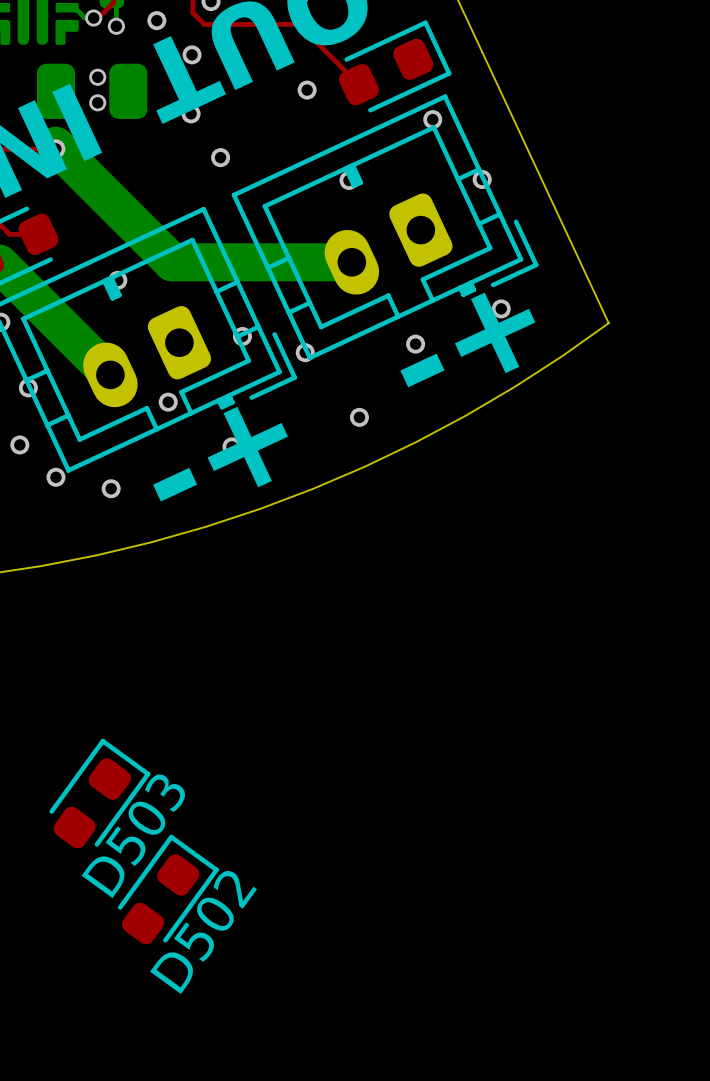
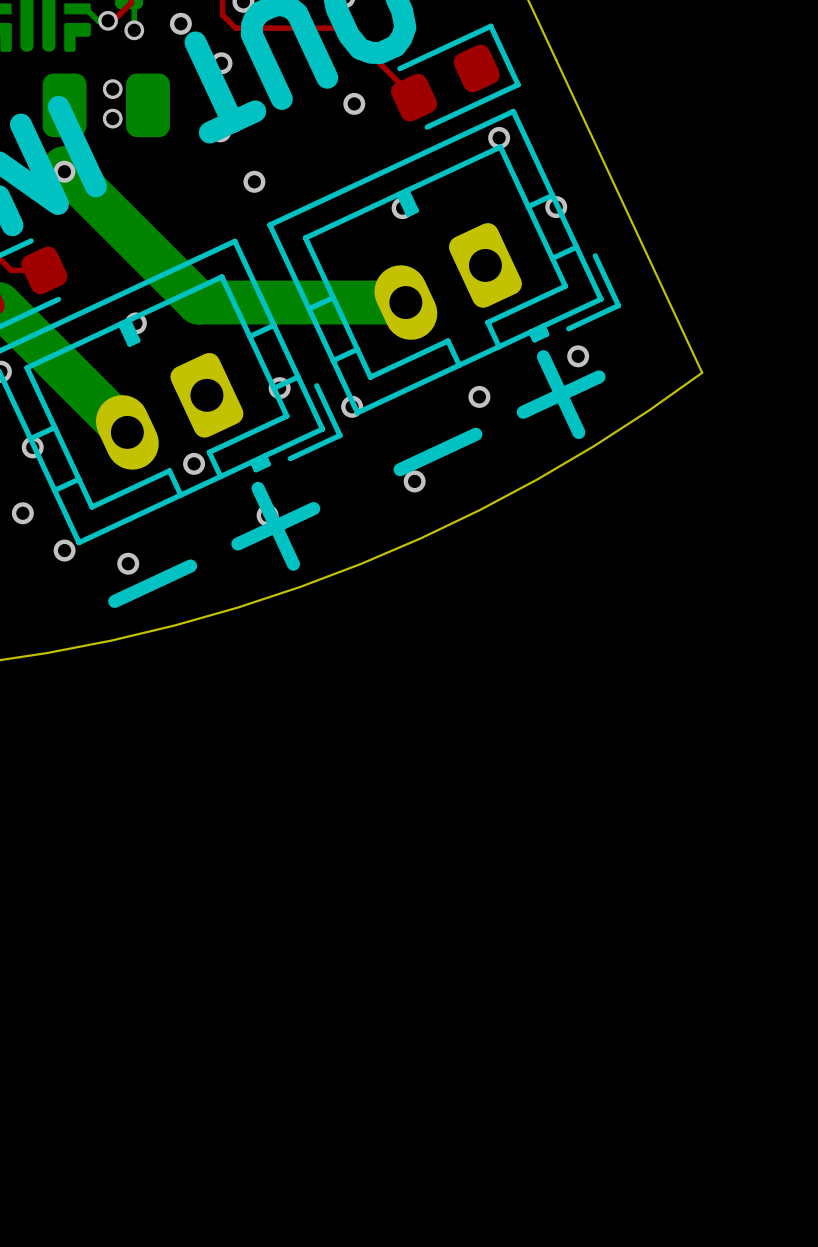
D503: (99, 793) -> none
D502: (168, 889) -> none

